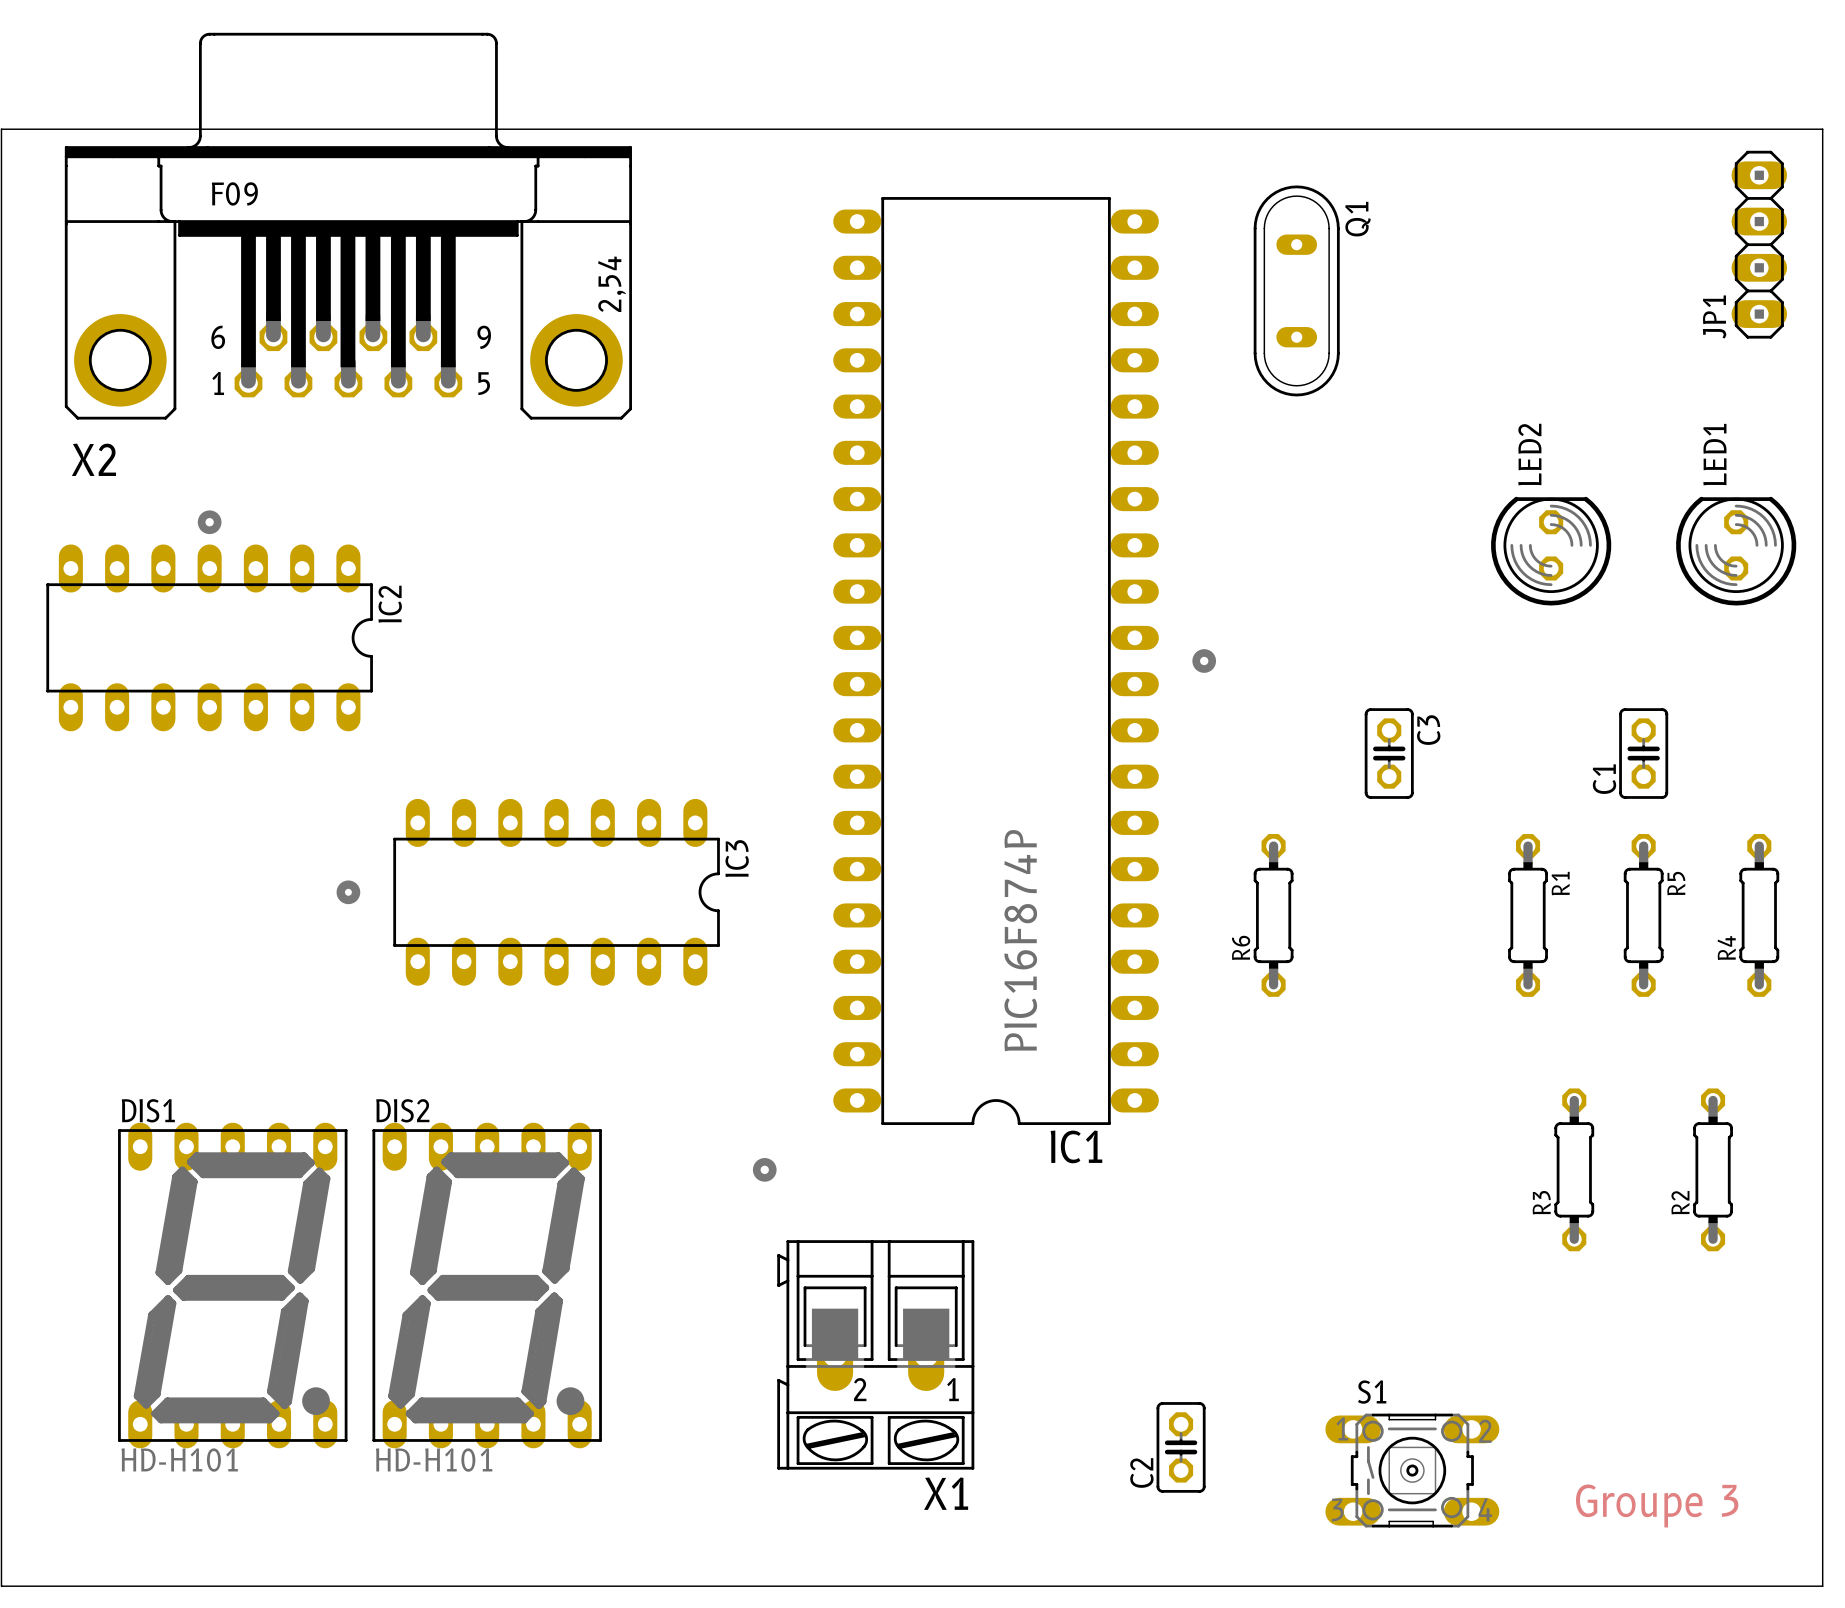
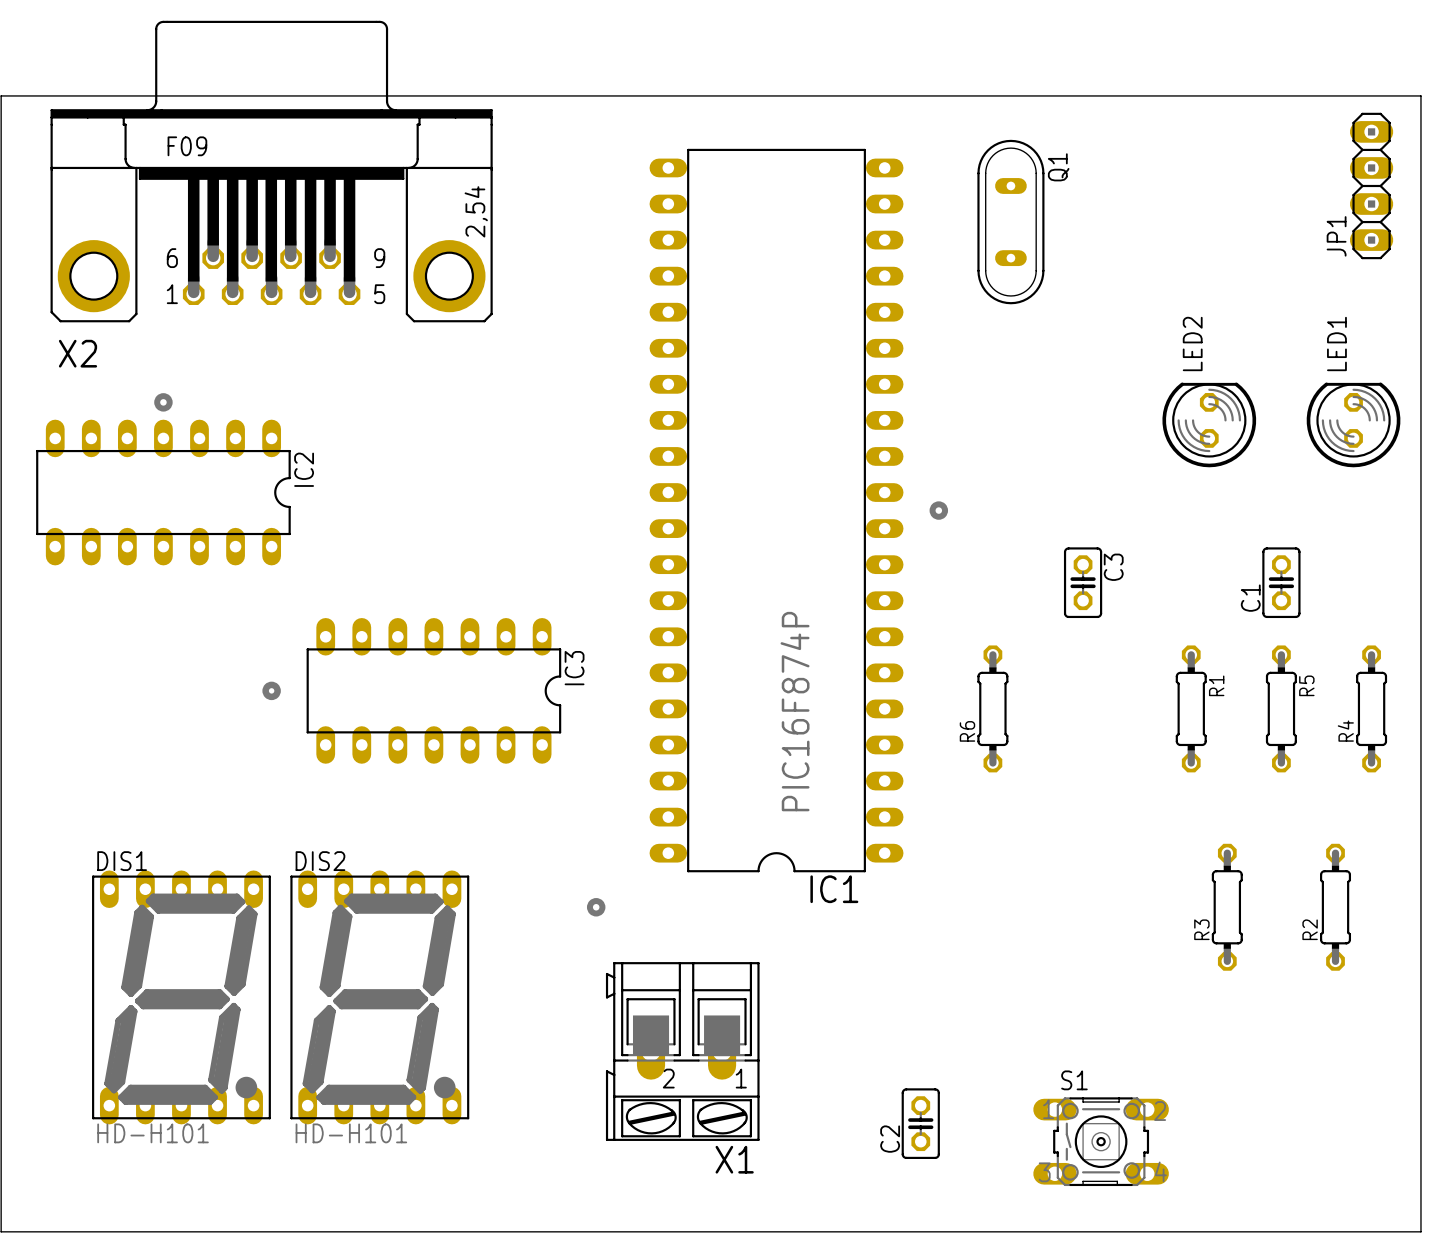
text: Groupe 3 (1657, 1505) -> none

